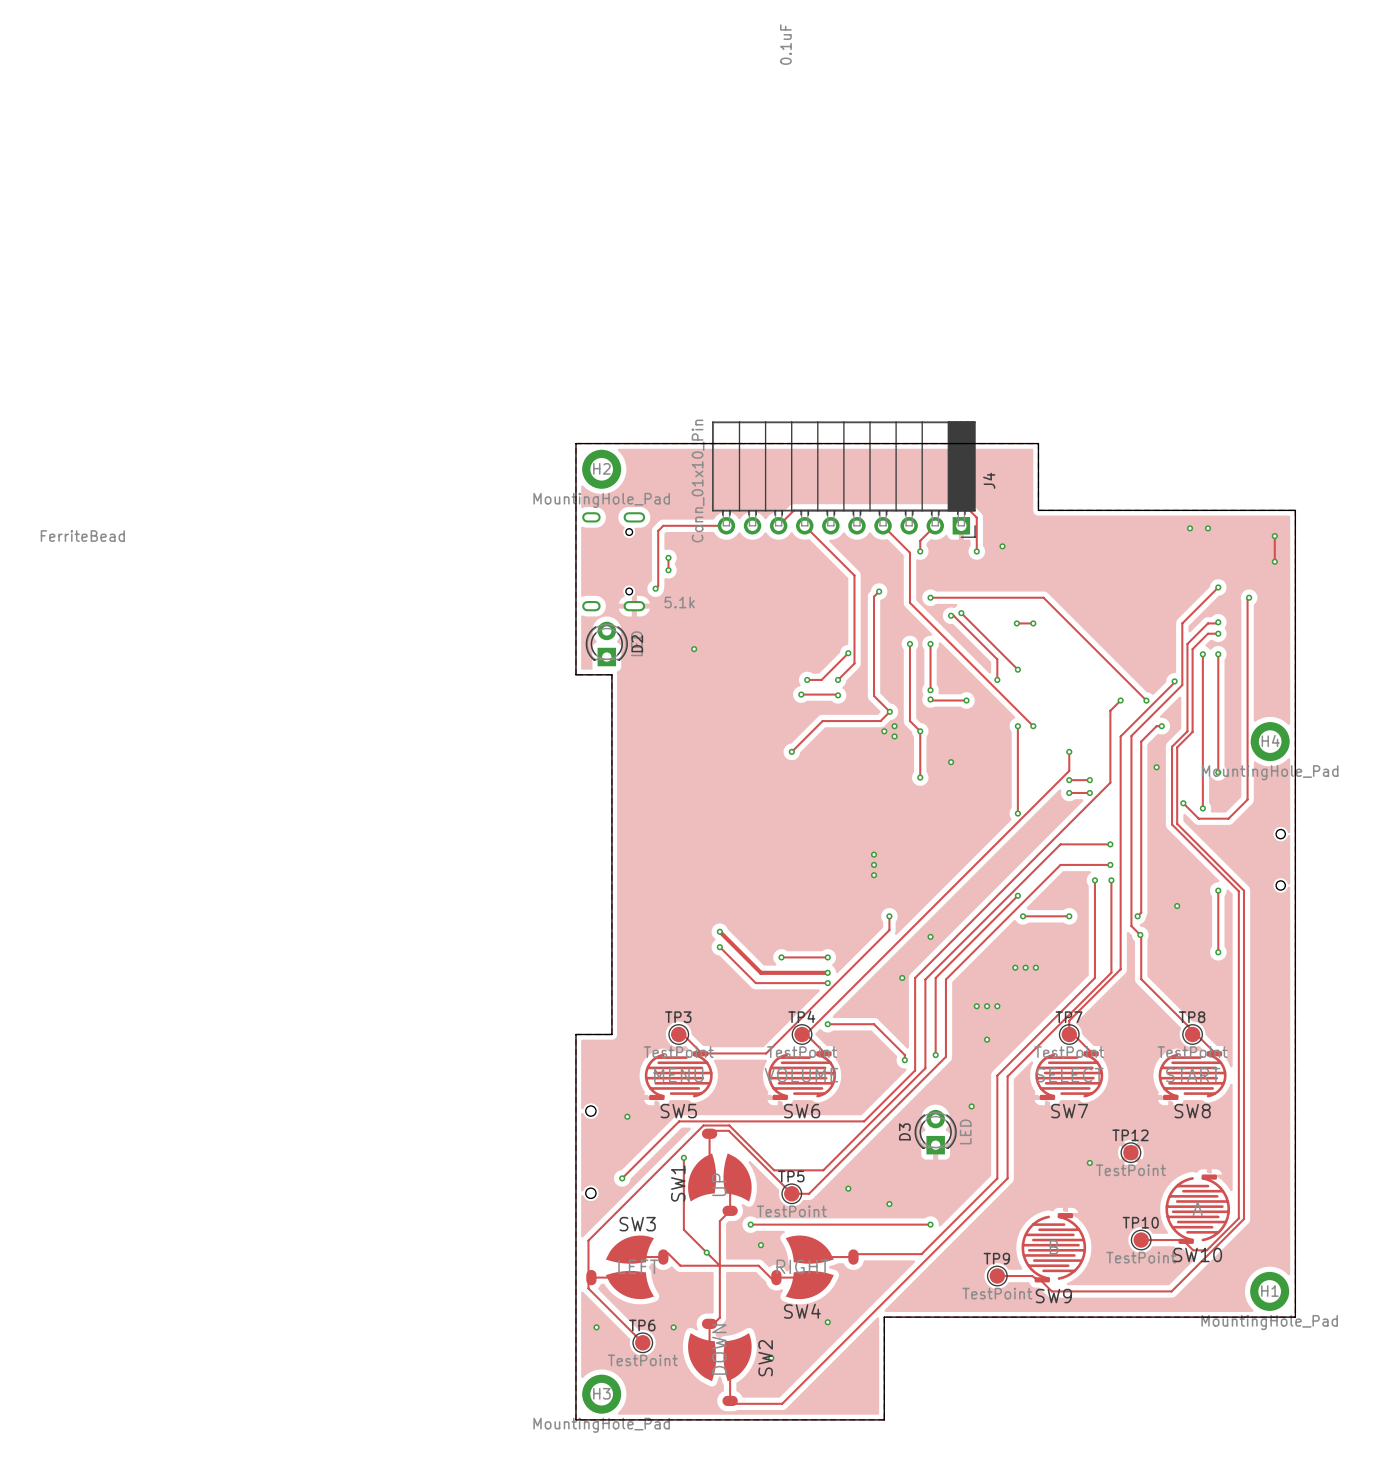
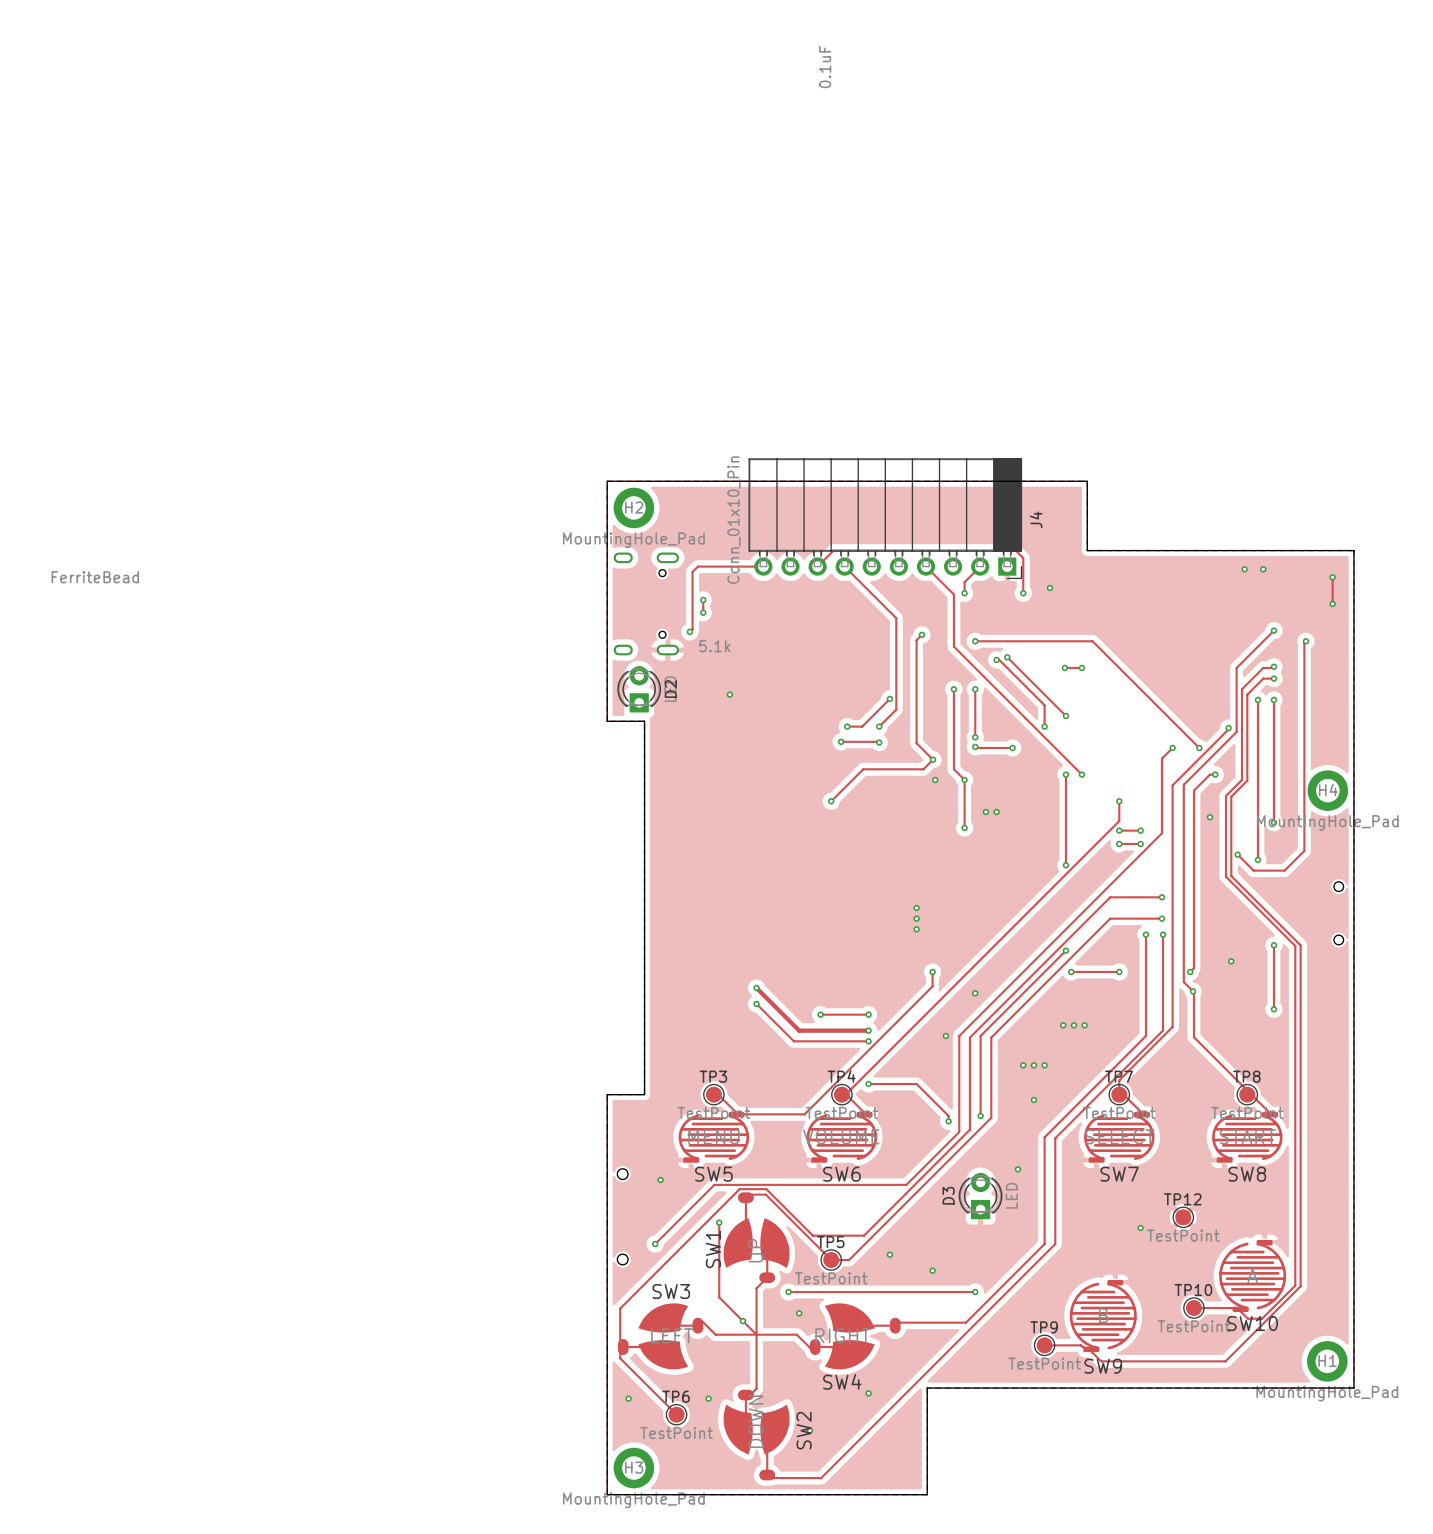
via: (894, 726) -> none
via: (884, 731) -> none
via: none -> (935, 779)
via: (894, 736) -> none
via: none -> (985, 811)

